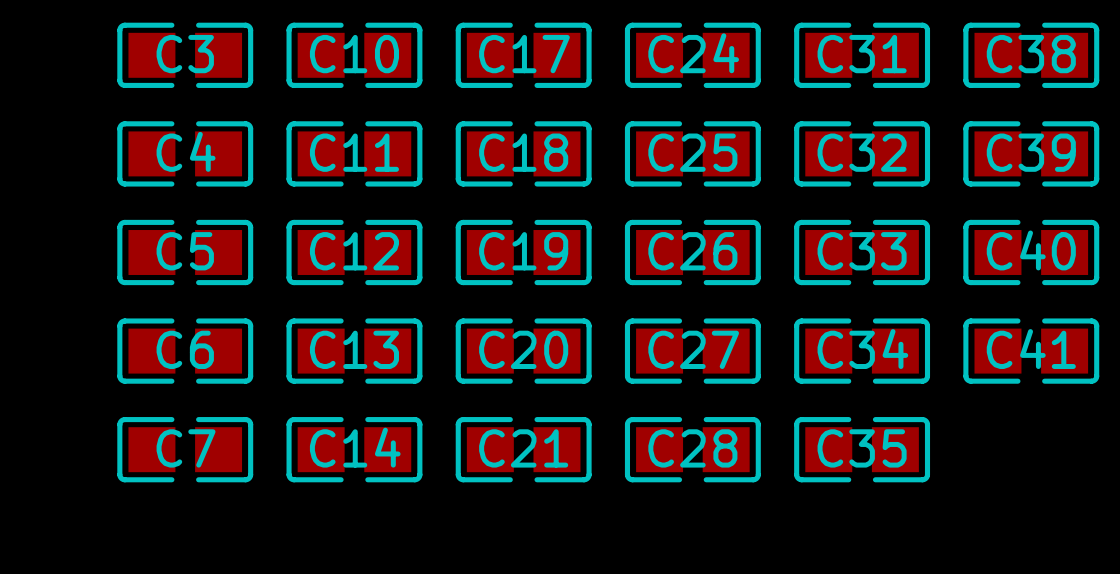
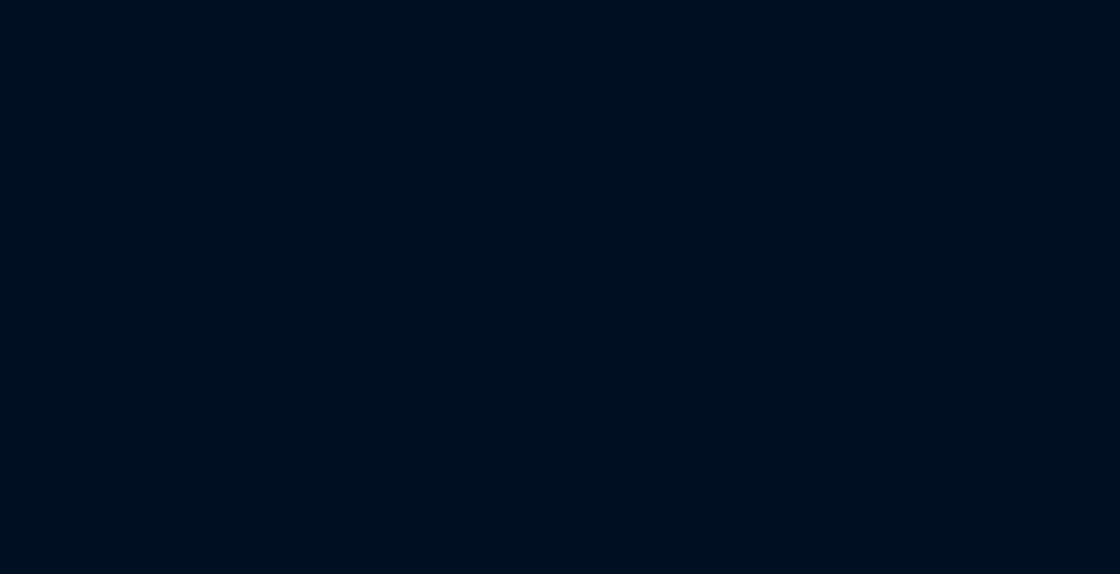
C3: (185, 55) -> none
C10: (354, 55) -> none
C17: (523, 55) -> none
C24: (692, 55) -> none
C31: (862, 55) -> none
C38: (1031, 55) -> none
C4: (185, 153) -> none
C11: (354, 153) -> none
C18: (523, 153) -> none
C25: (692, 153) -> none
C32: (862, 153) -> none
C39: (1031, 153) -> none
C5: (185, 252) -> none
C12: (354, 252) -> none
C19: (523, 252) -> none
C26: (692, 252) -> none
C33: (862, 252) -> none
C40: (1031, 252) -> none
C6: (185, 351) -> none
C13: (354, 351) -> none
C20: (523, 351) -> none
C27: (692, 351) -> none
C34: (862, 351) -> none
C41: (1031, 351) -> none
C7: (185, 449) -> none
C14: (354, 449) -> none
C21: (523, 449) -> none
C28: (692, 449) -> none
C35: (862, 449) -> none

